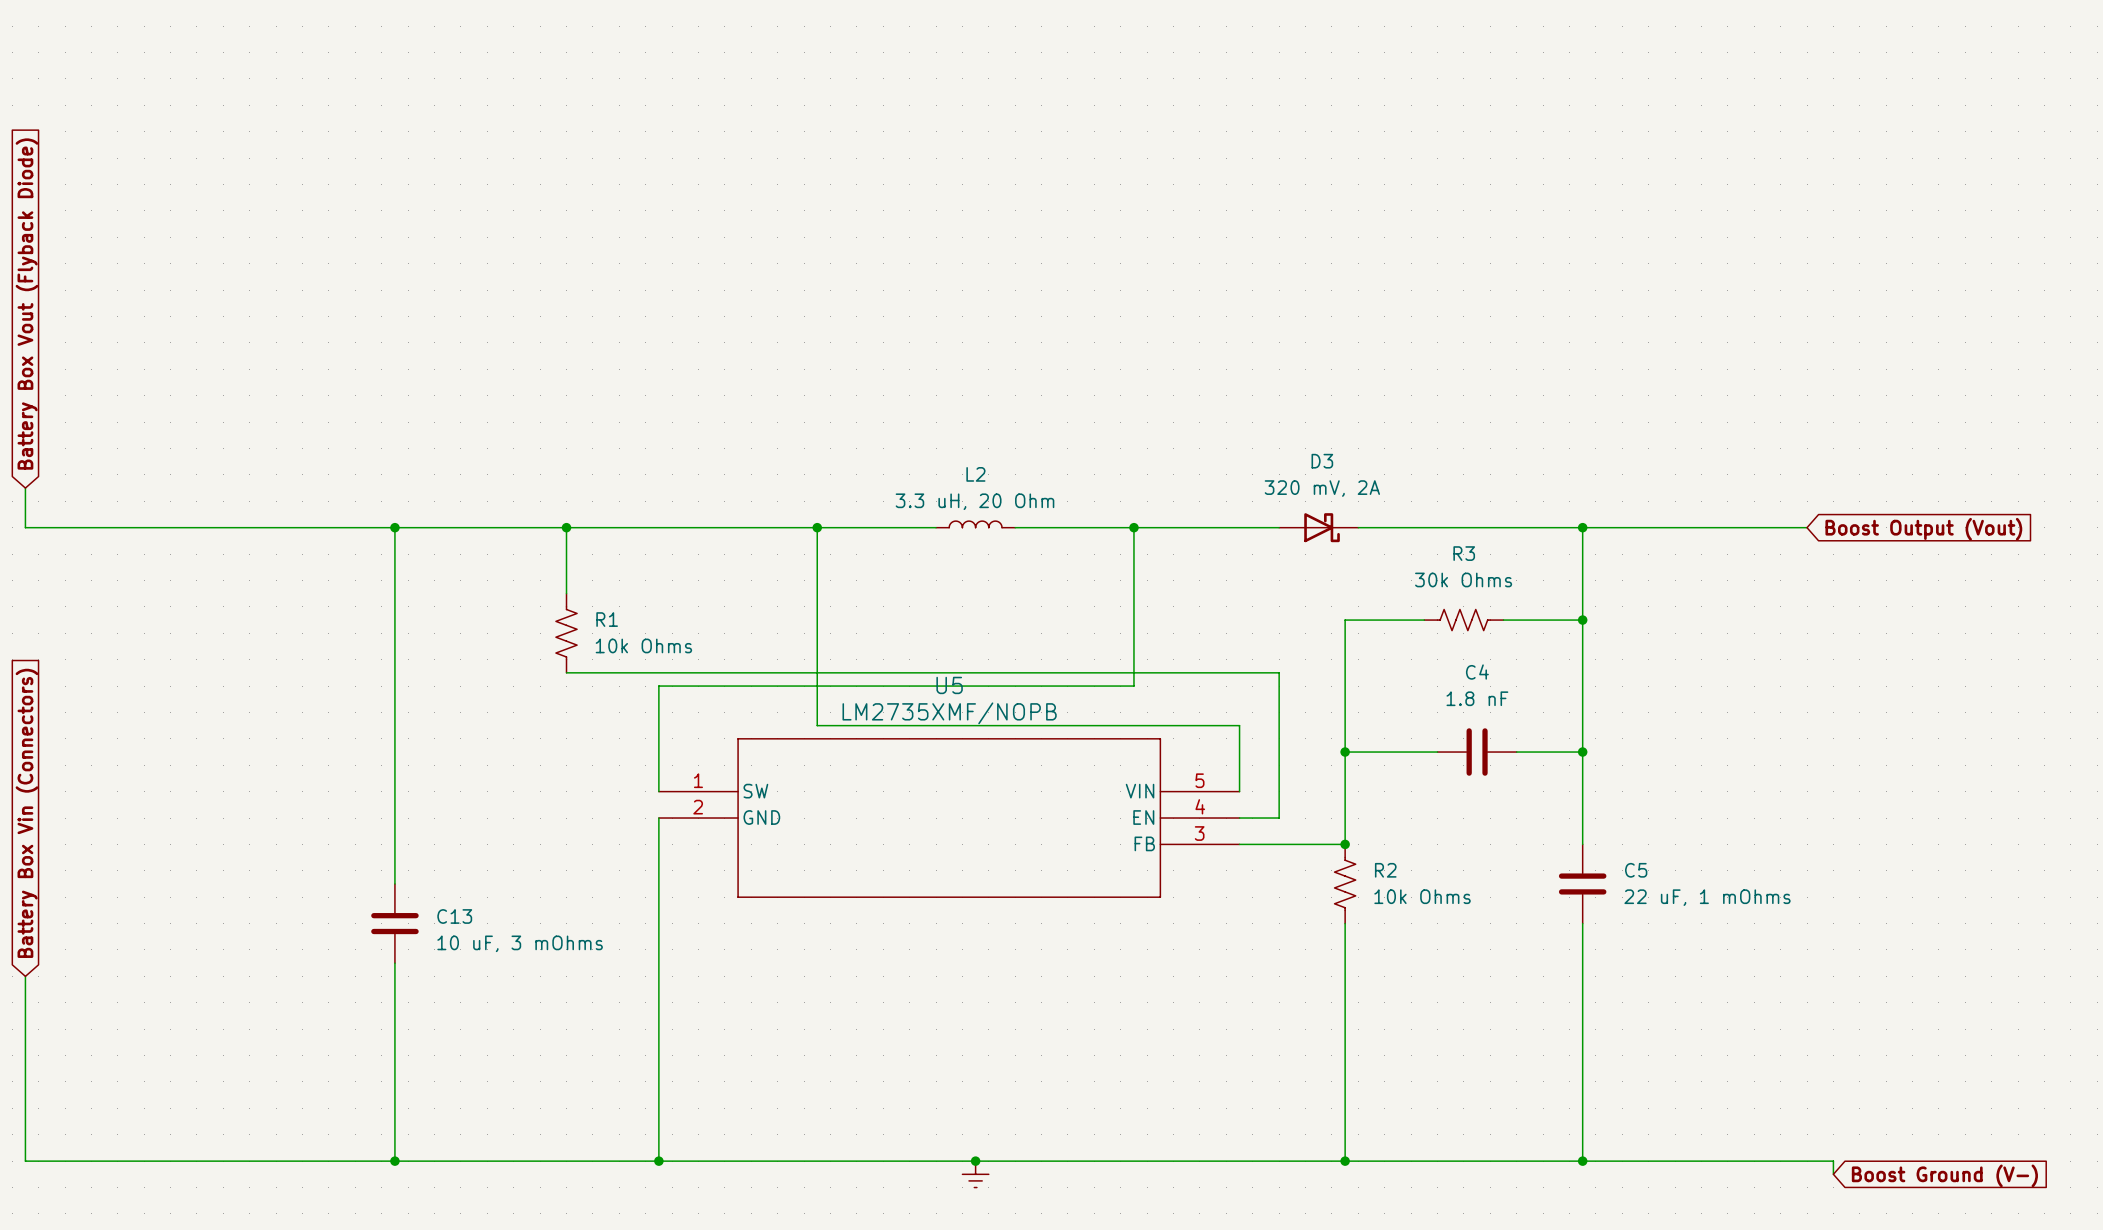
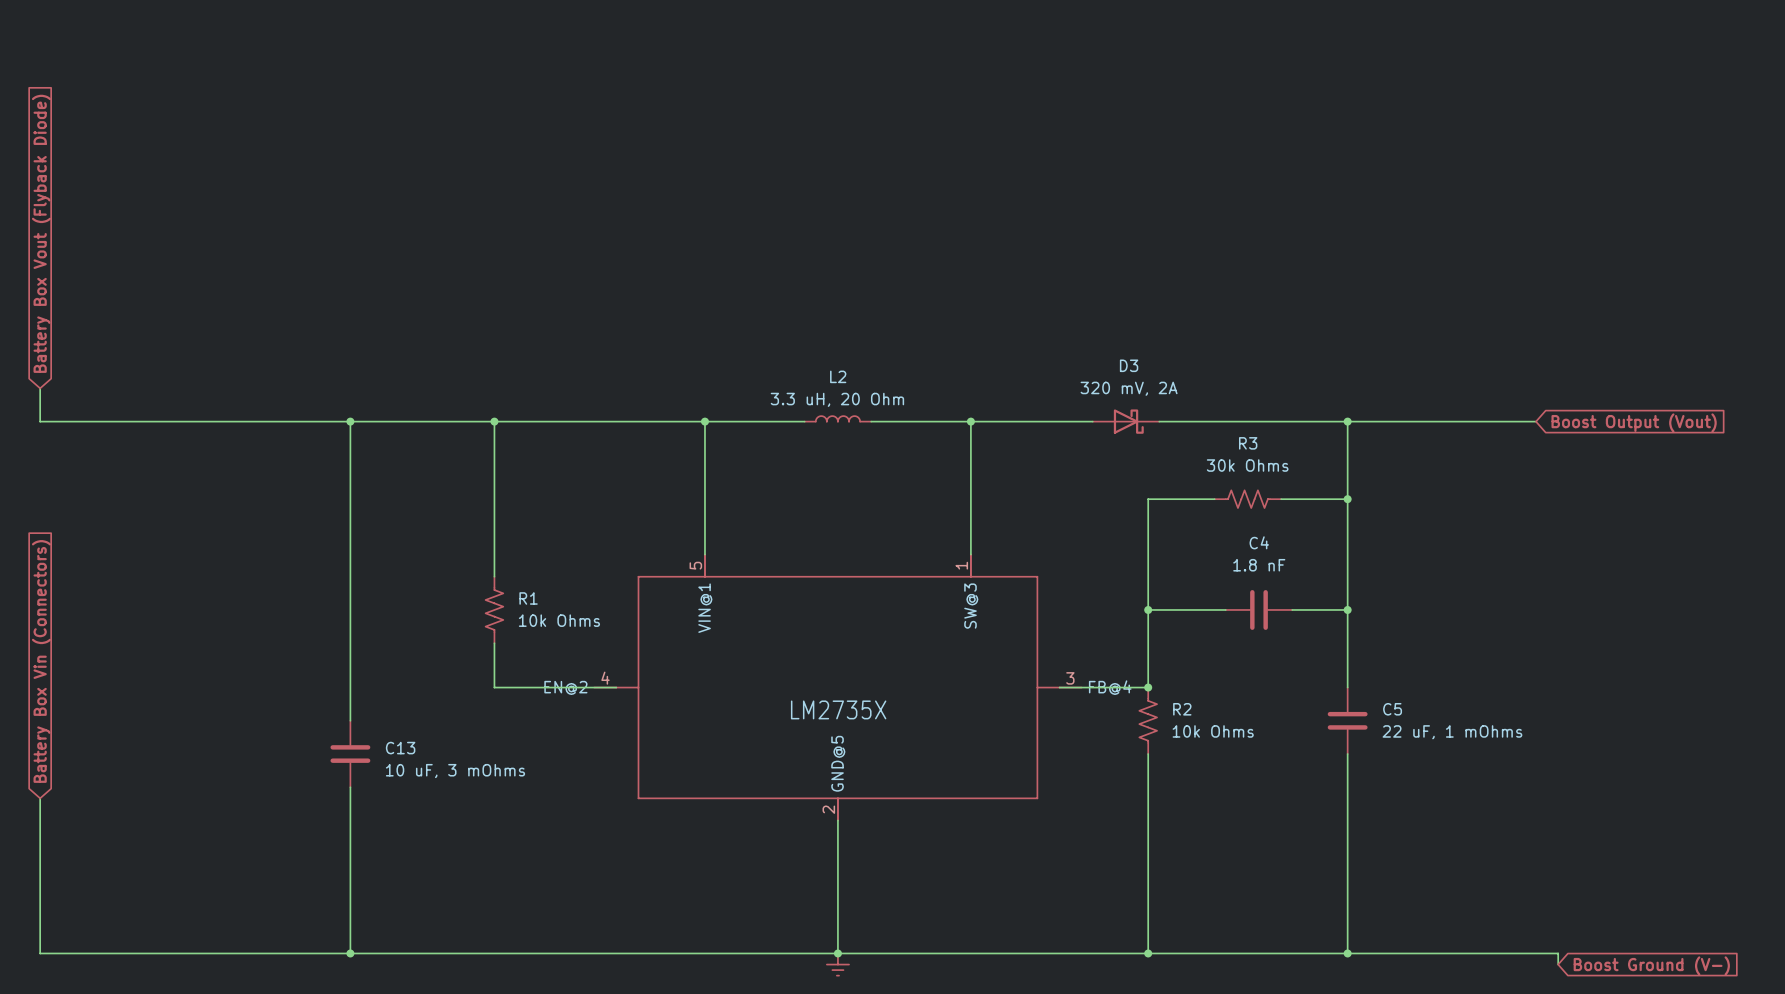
wire: none -> (494, 477) (494, 576)
R1 position: (566, 633) -> (494, 609)
wire: (566, 672) (1279, 672) (1279, 818) (1239, 818) -> none
wire: (817, 686) (817, 725) (1239, 725) (1239, 791) -> none
wire: (1133, 686) (658, 686) (658, 791) -> none
wire: none -> (494, 643) (494, 687) (616, 687)
wire: (658, 818) (658, 1161) -> none
U5: LM2735XMF/NOPB (949, 818) -> none
part: none -> LM2735X (837, 687)
wire: none -> (837, 820) (837, 953)
junction: (658, 1161) -> none

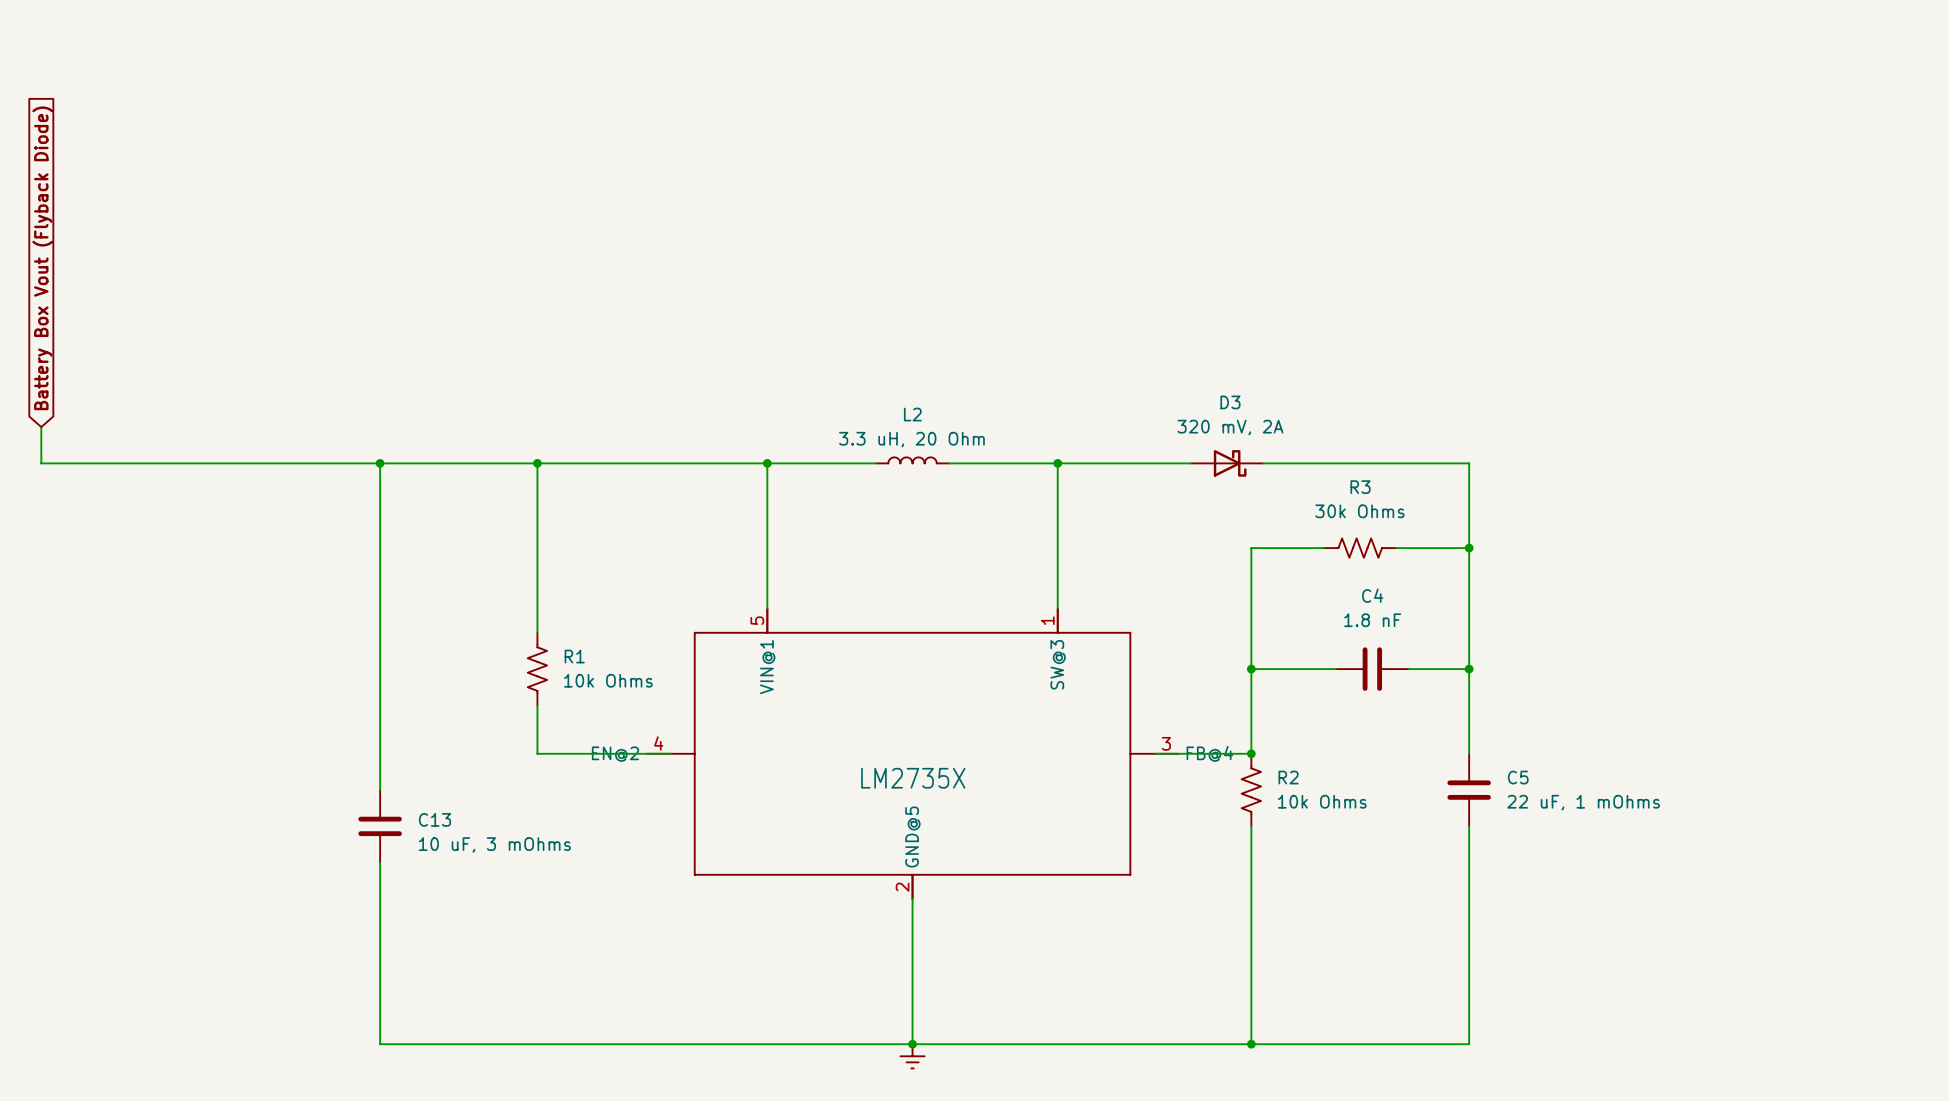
wire: (1347, 421) (1536, 421) -> none
junction: (1347, 421) -> none
global label: Boost Output (Vout) (1634, 422) -> none
global label: Battery Box Vin (Connectors) (41, 661) -> none
wire: (40, 798) (40, 953) (350, 953) -> none
junction: (350, 953) -> none
wire: (1347, 953) (1558, 953) (1558, 964) -> none
junction: (1347, 953) -> none
global label: Boost Ground (V-) (1651, 965) -> none

